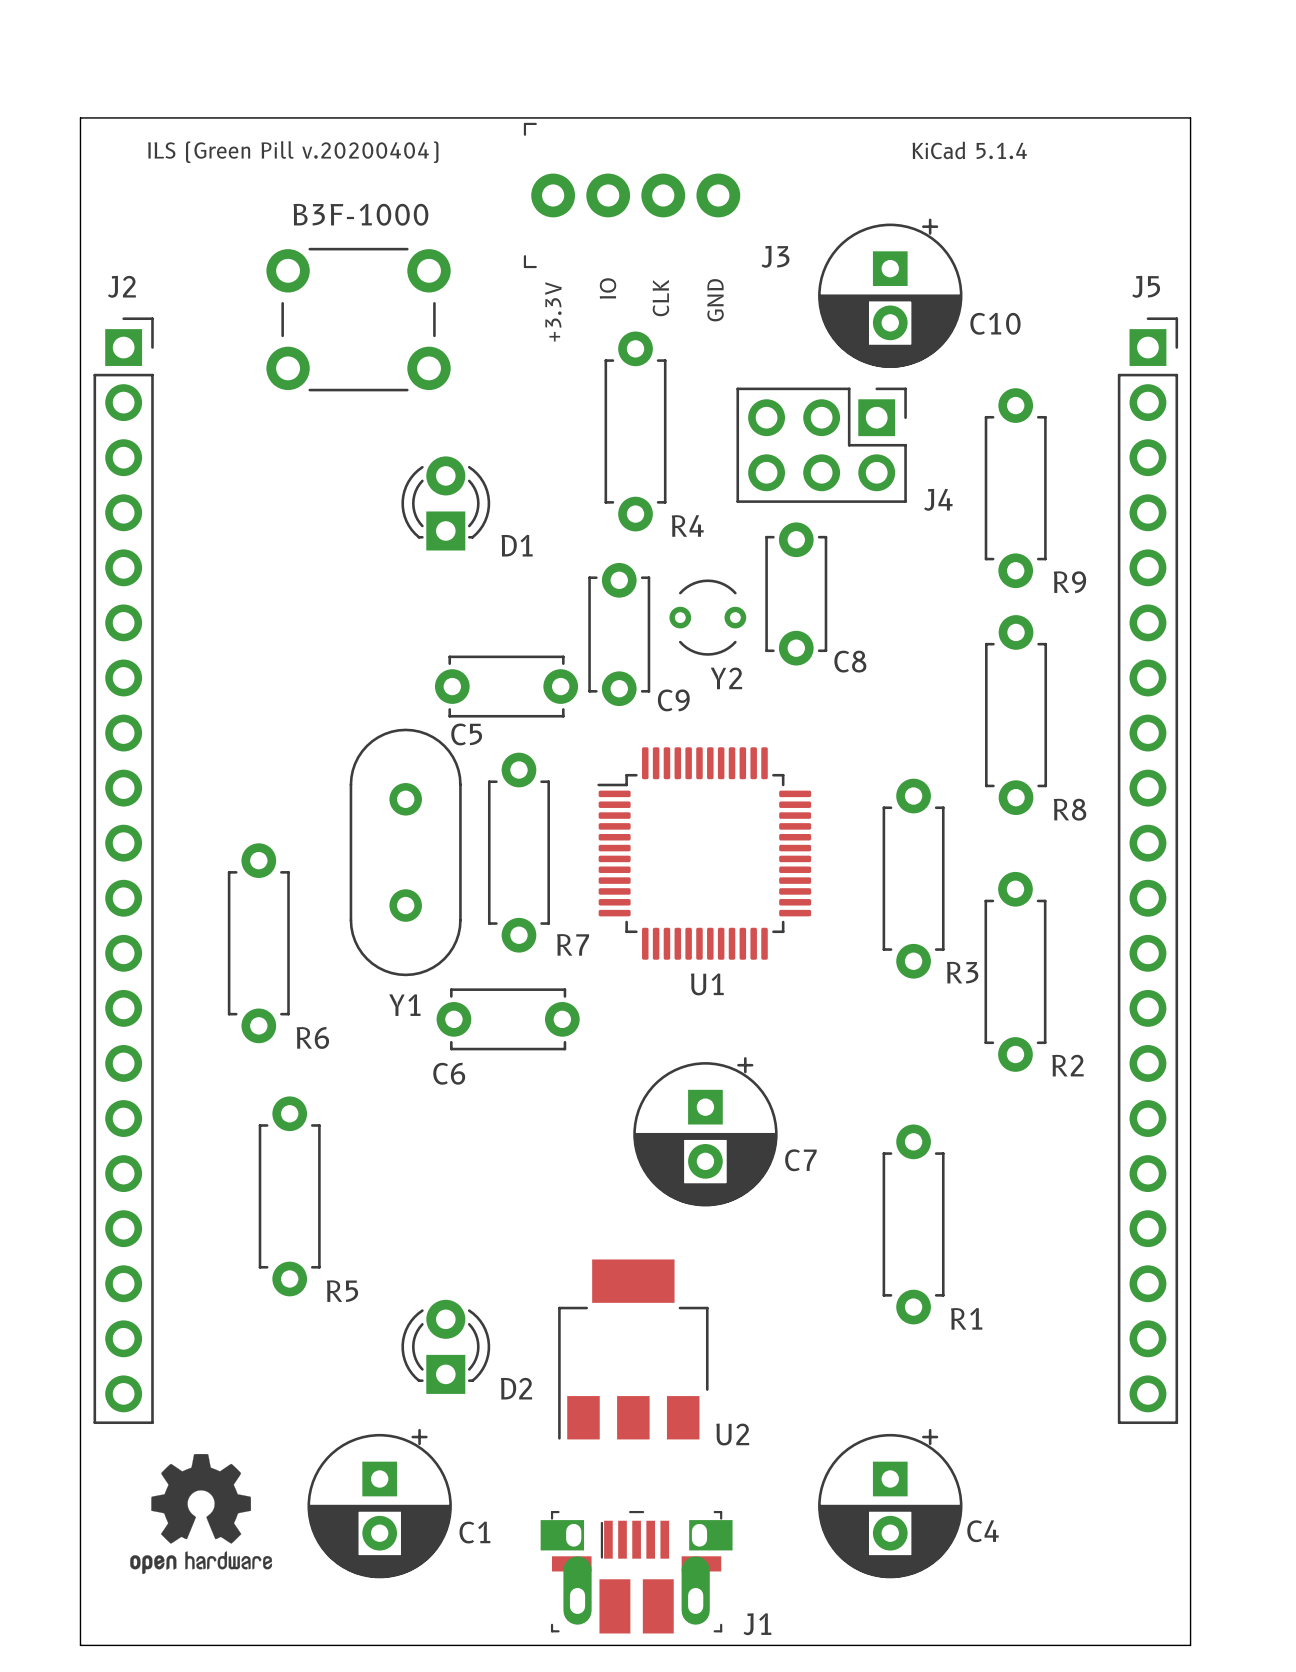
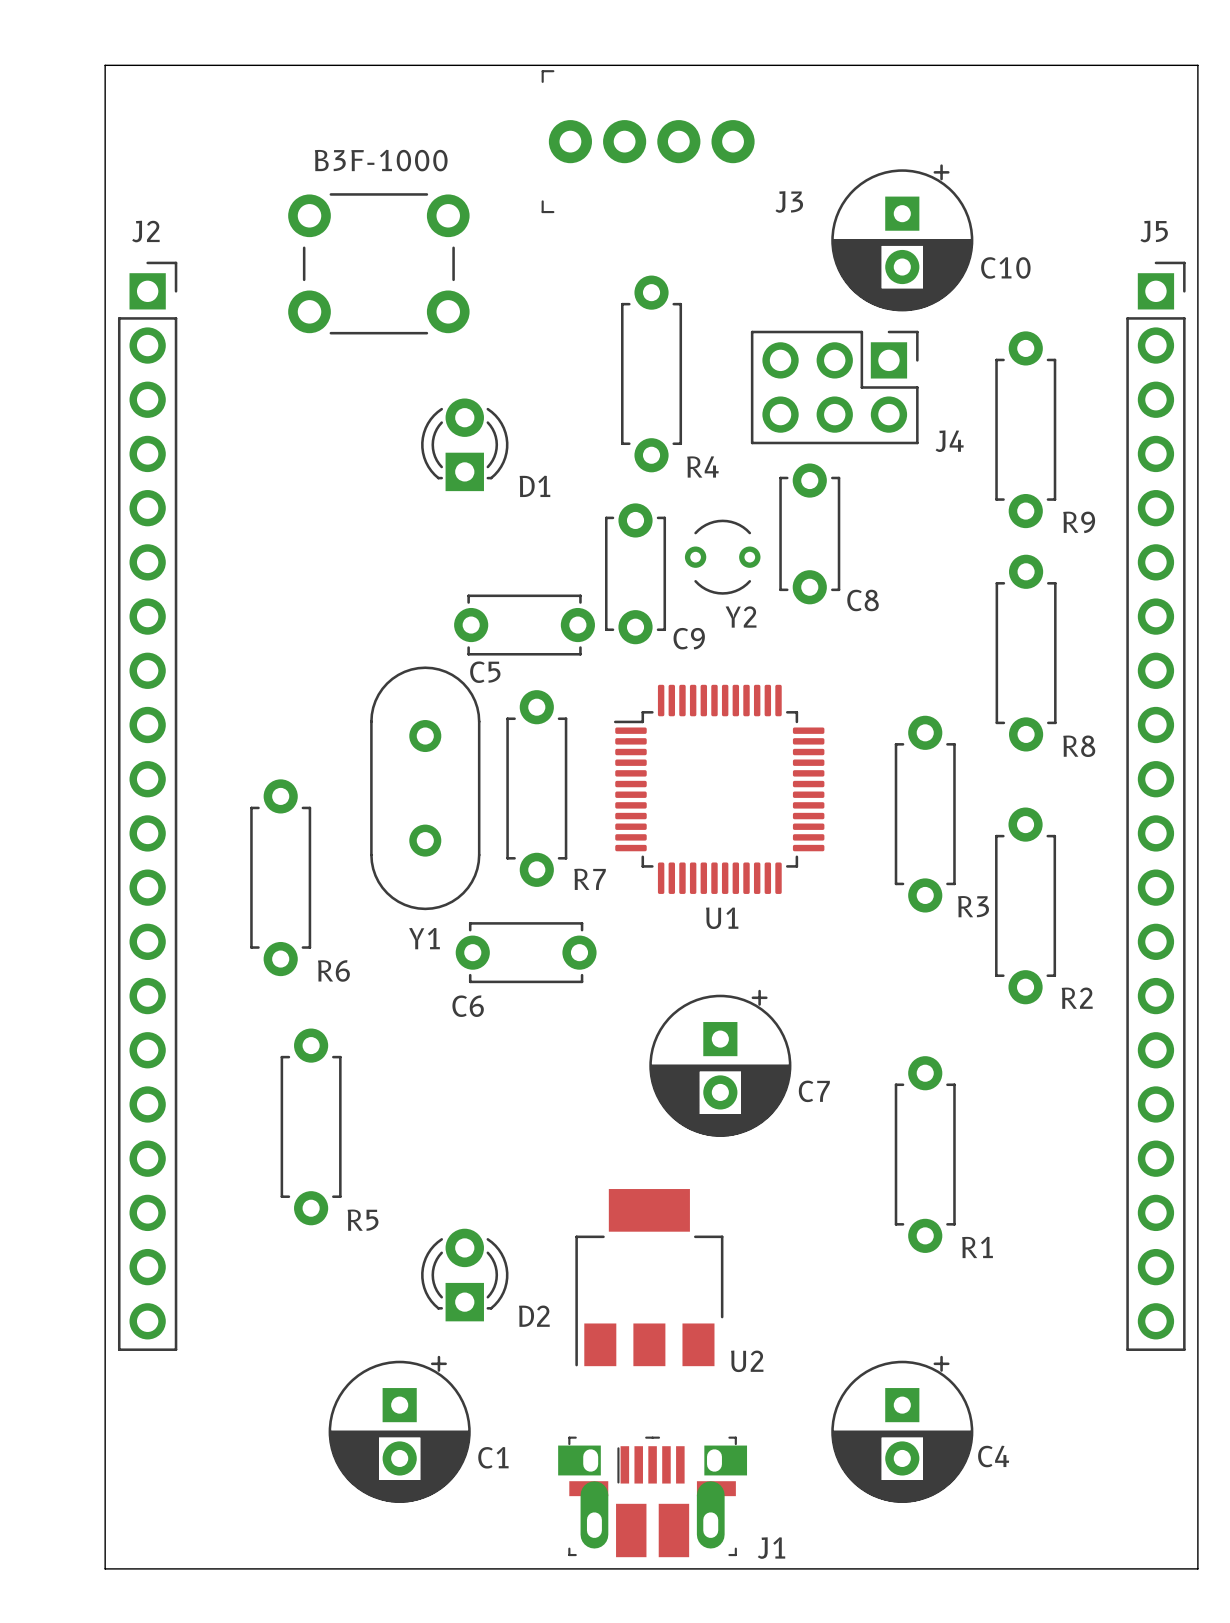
text: KiCad 5.1.4 (969, 150) -> none
text: ILS (Green Pill v.20200404) (293, 152) -> none
text: IO (608, 288) -> none
text: CLK (660, 298) -> none
text: GND (715, 300) -> none
text: +3.3V (553, 311) -> none
drawing: [130, 1454, 273, 1575] -> none

